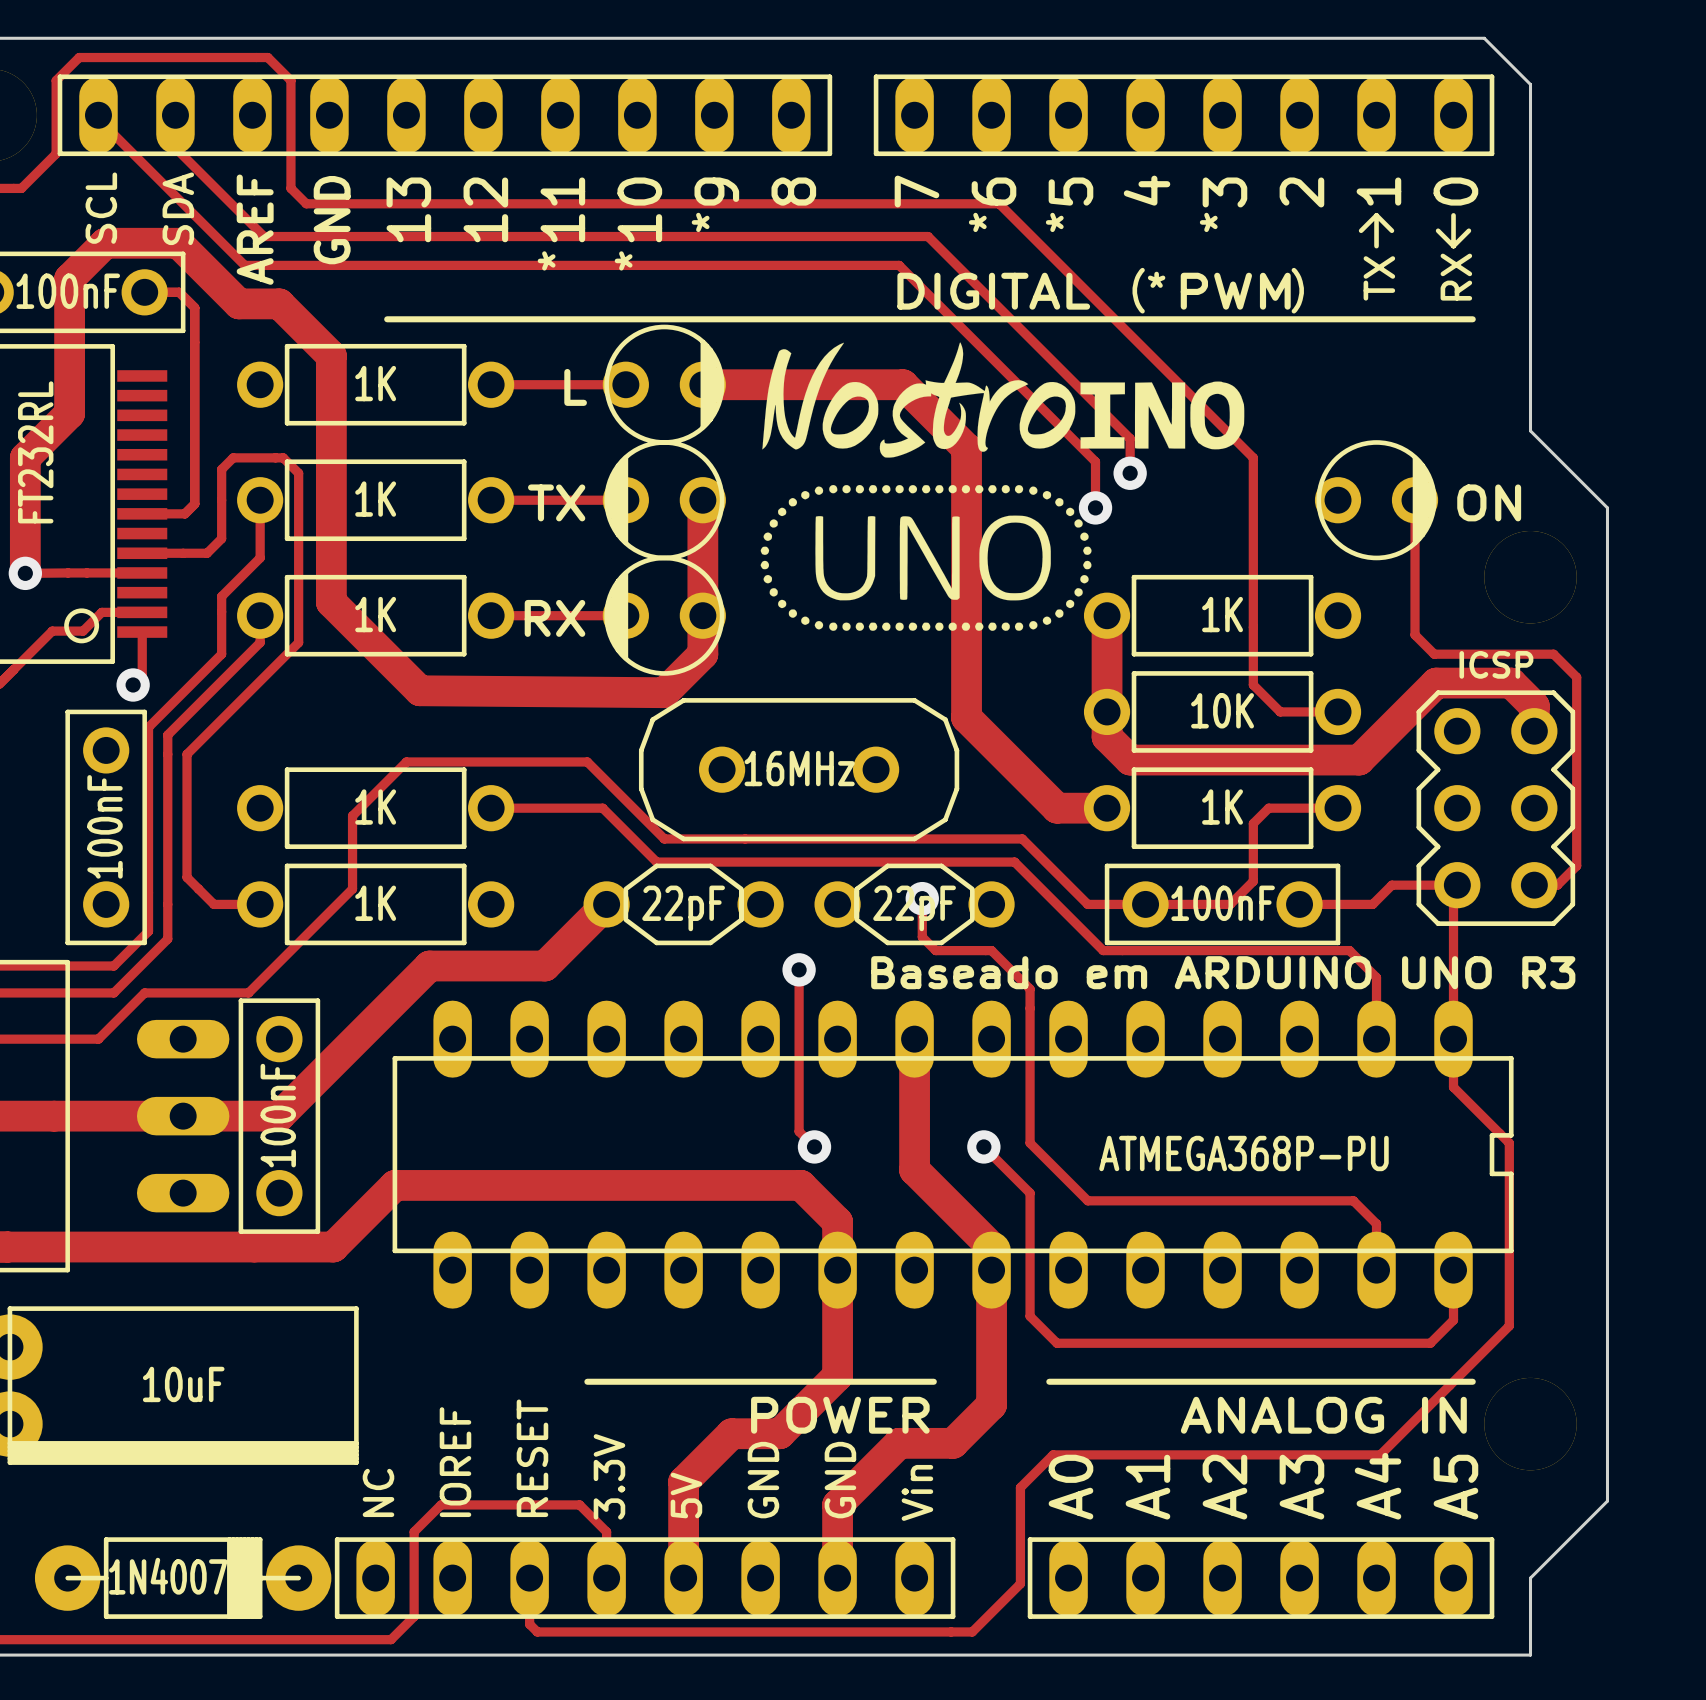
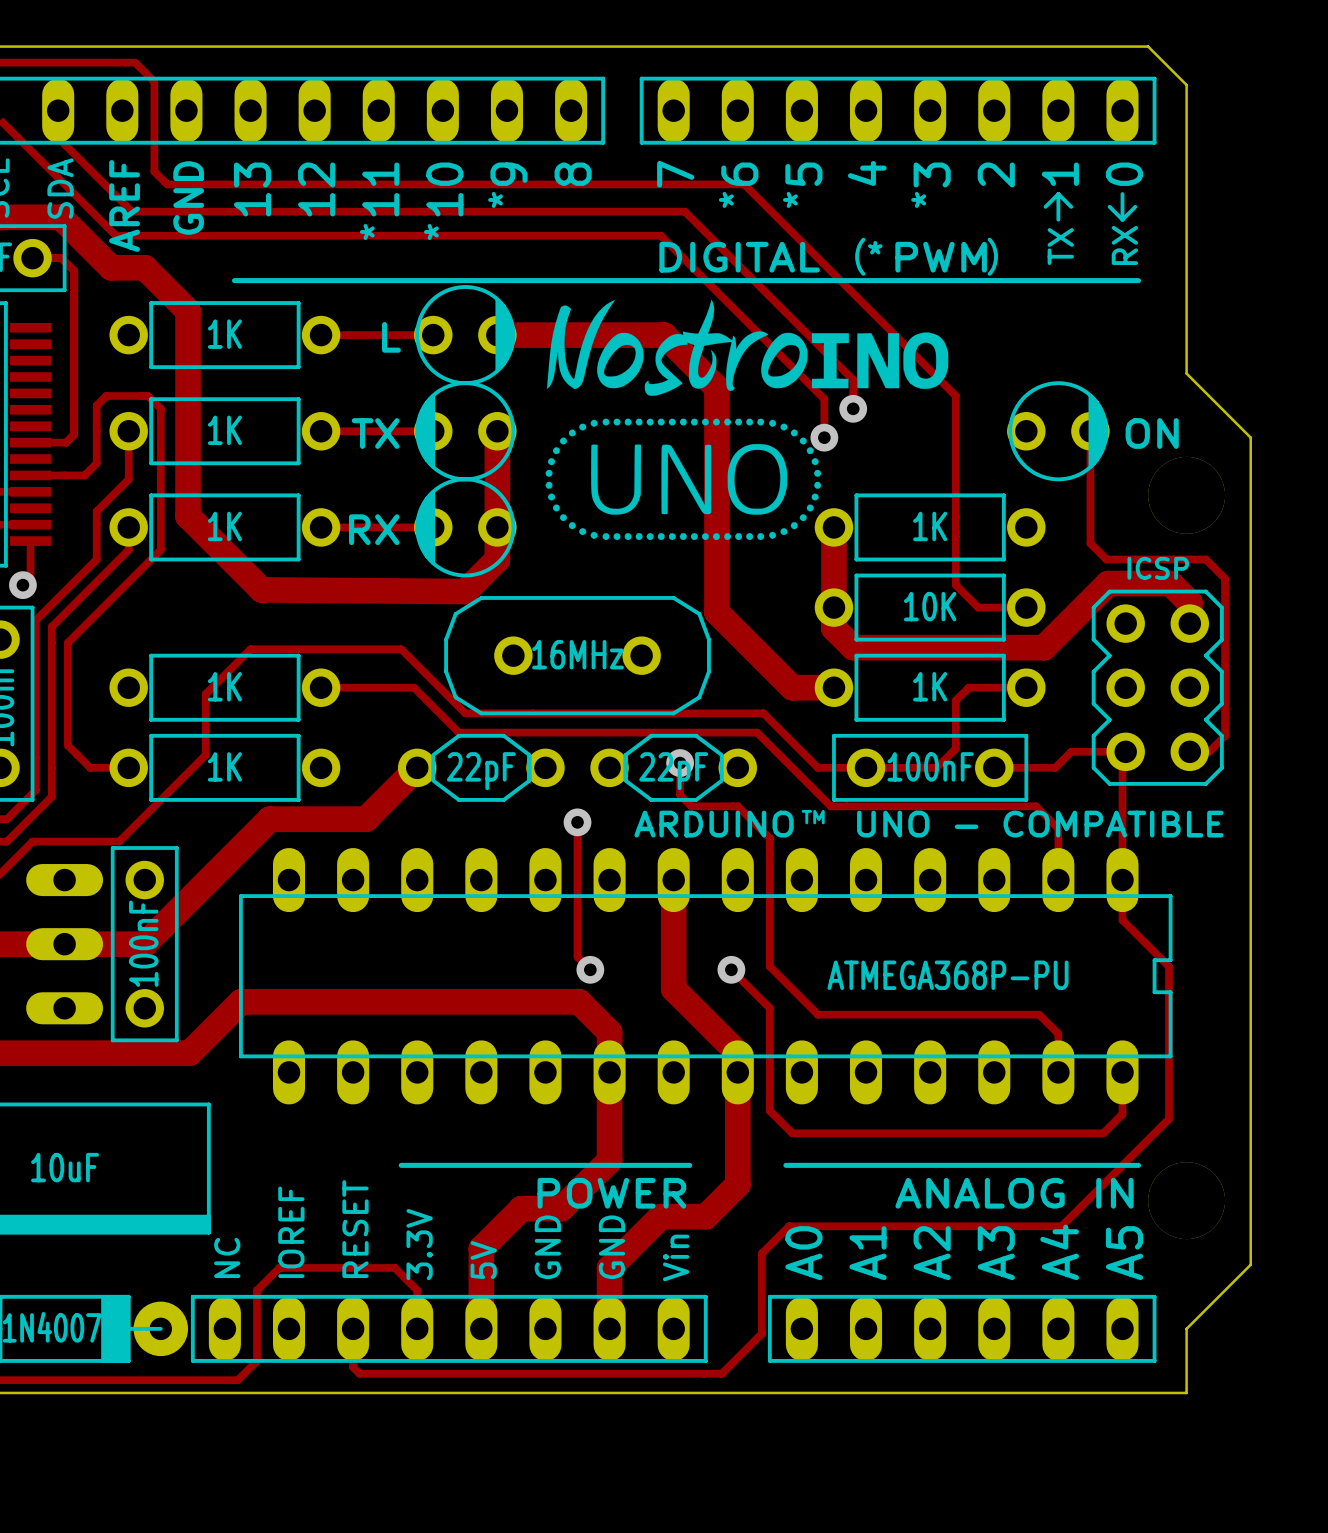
text: none -> TM (813, 817)
text: Baseado em ARDUINO UNO R3 (1223, 972) -> ARDUINO UNO - COMPATIBLE (928, 824)

